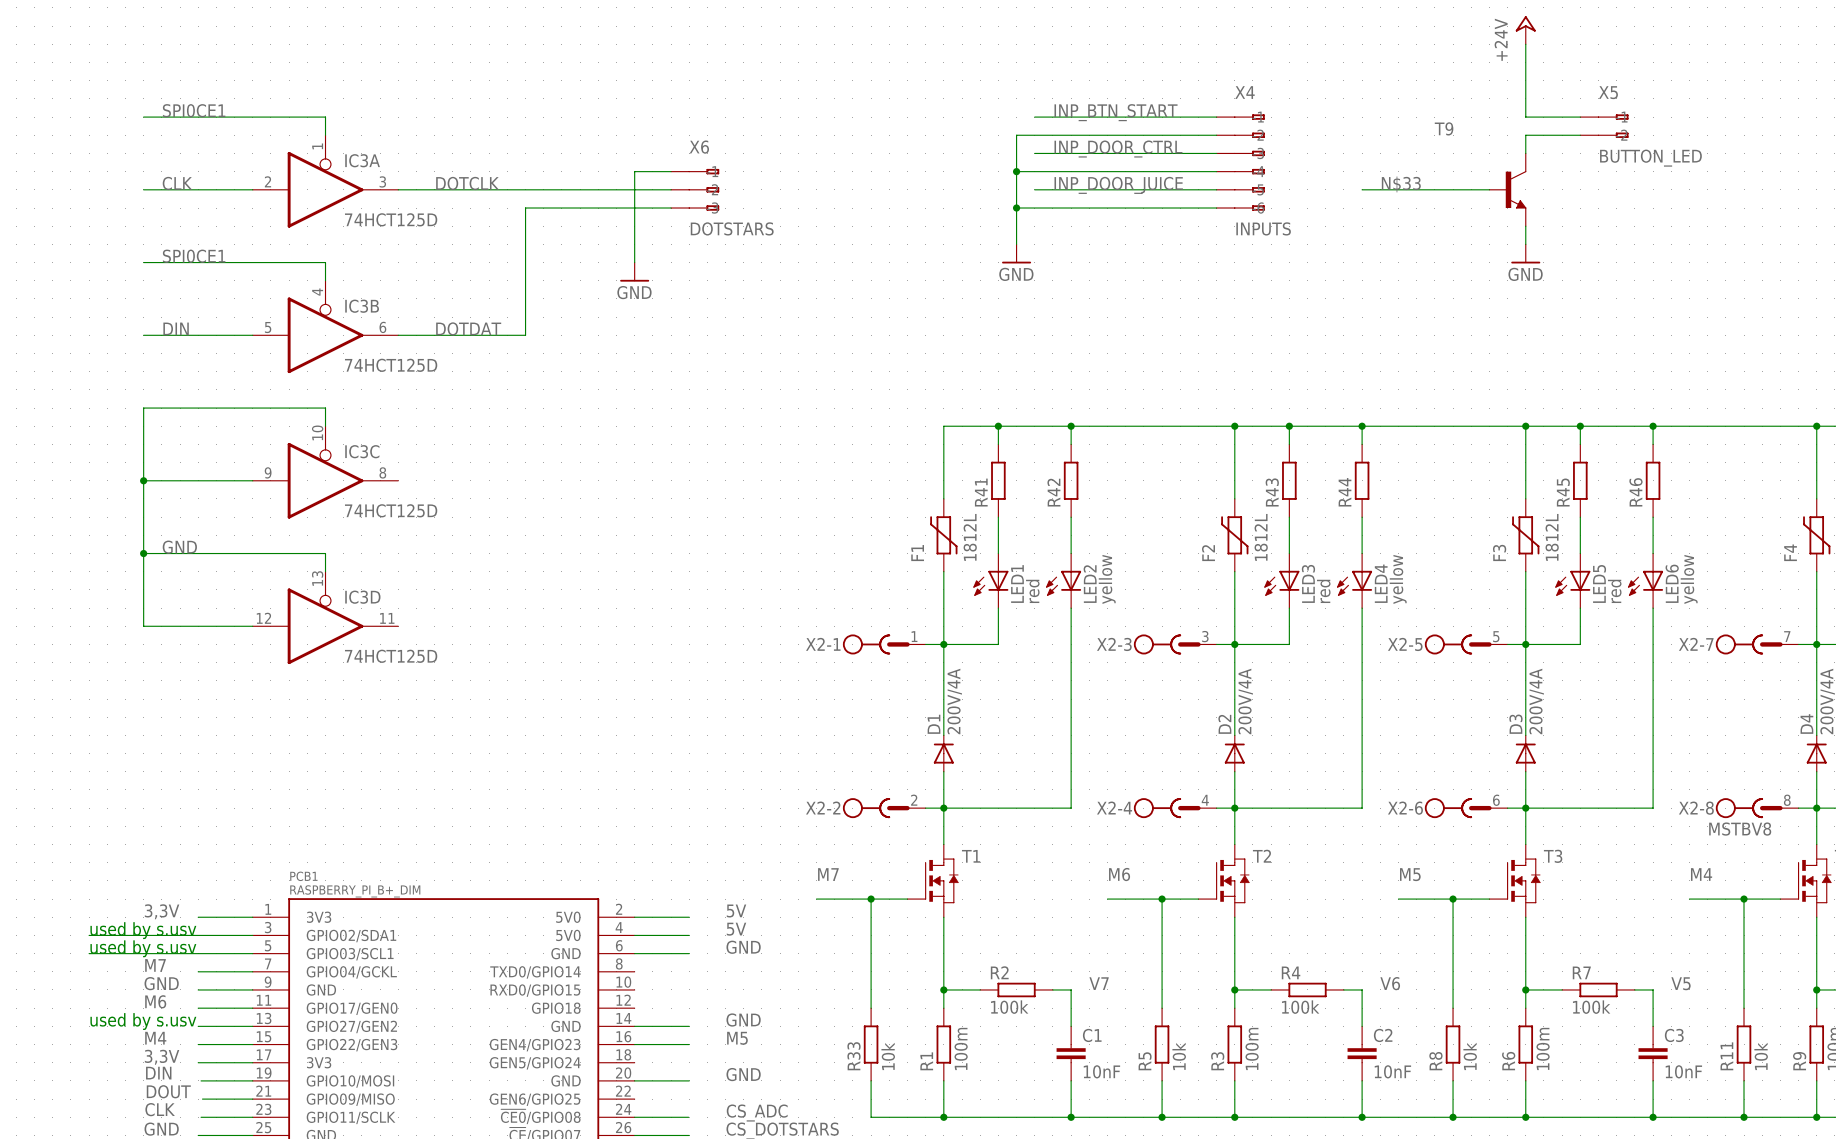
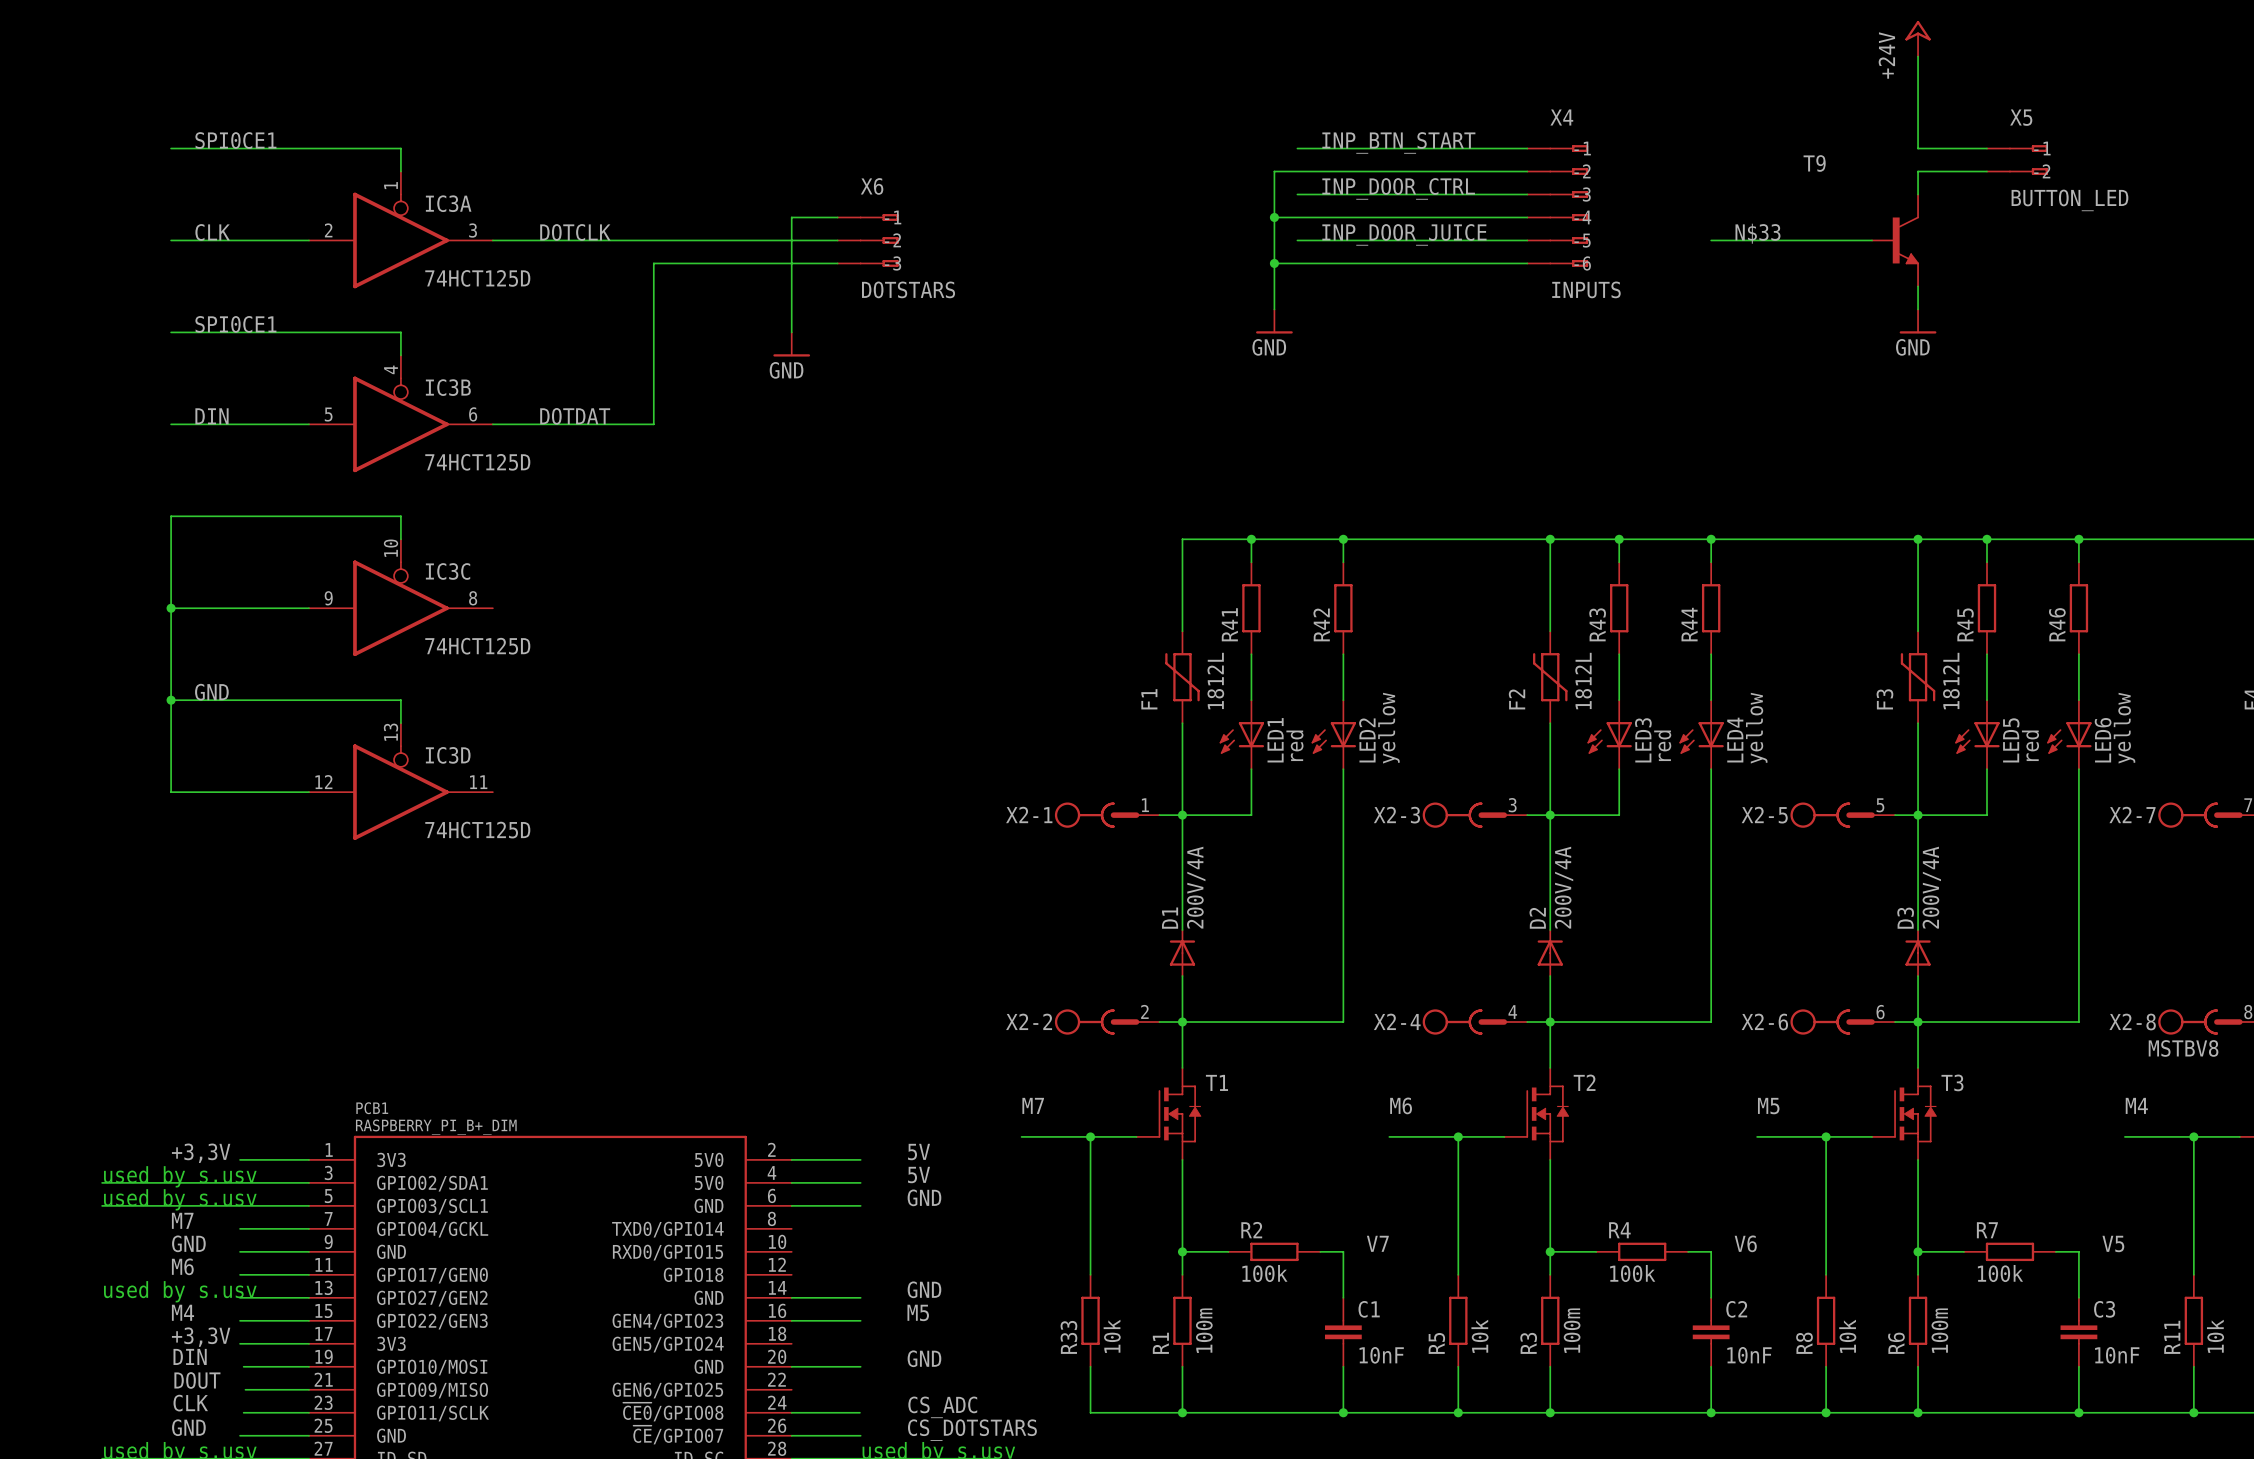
label: 3,3V (162, 911) -> +3,3V (201, 1153)
label: 3,3V (162, 1057) -> +3,3V (201, 1337)

